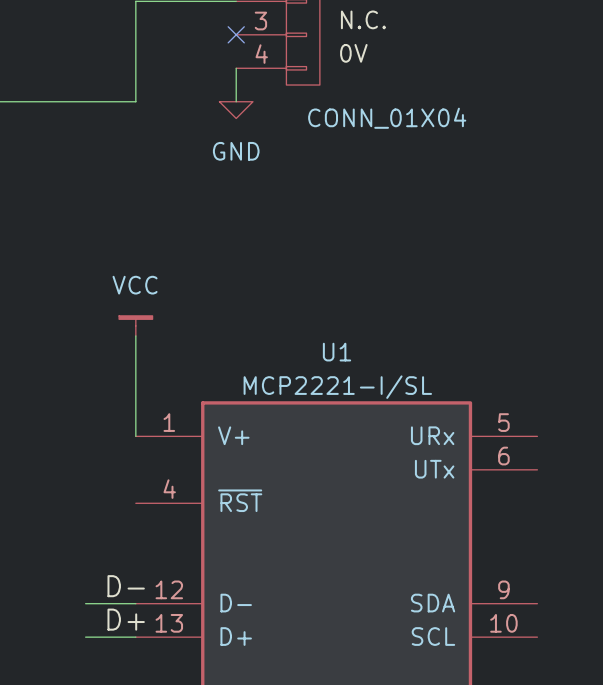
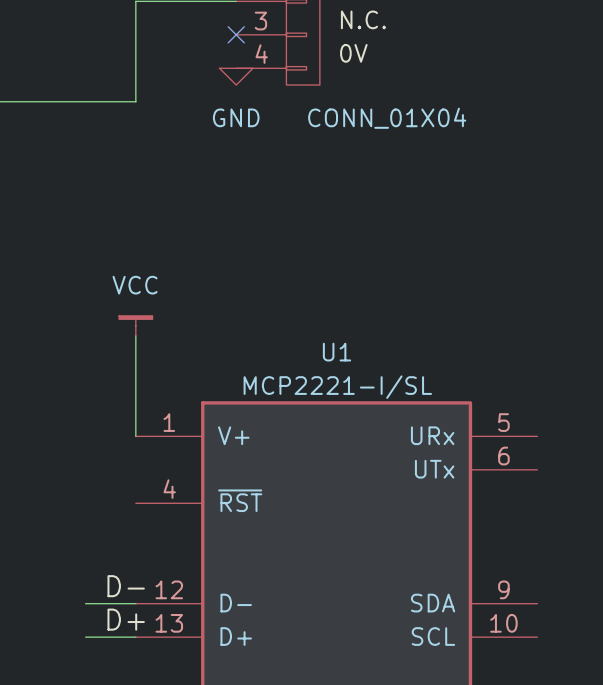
wire: (236, 68) (236, 101) -> none
power symbol position: GND (236, 110) -> GND (236, 76)

